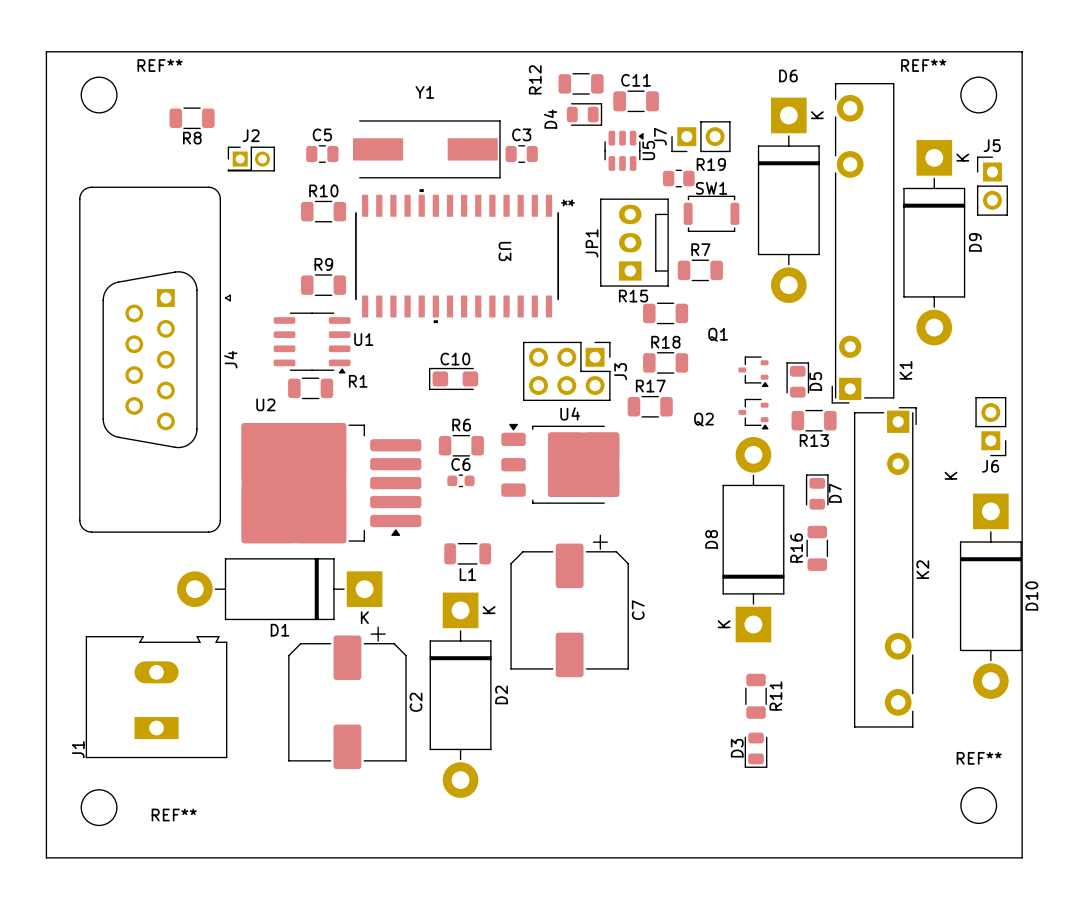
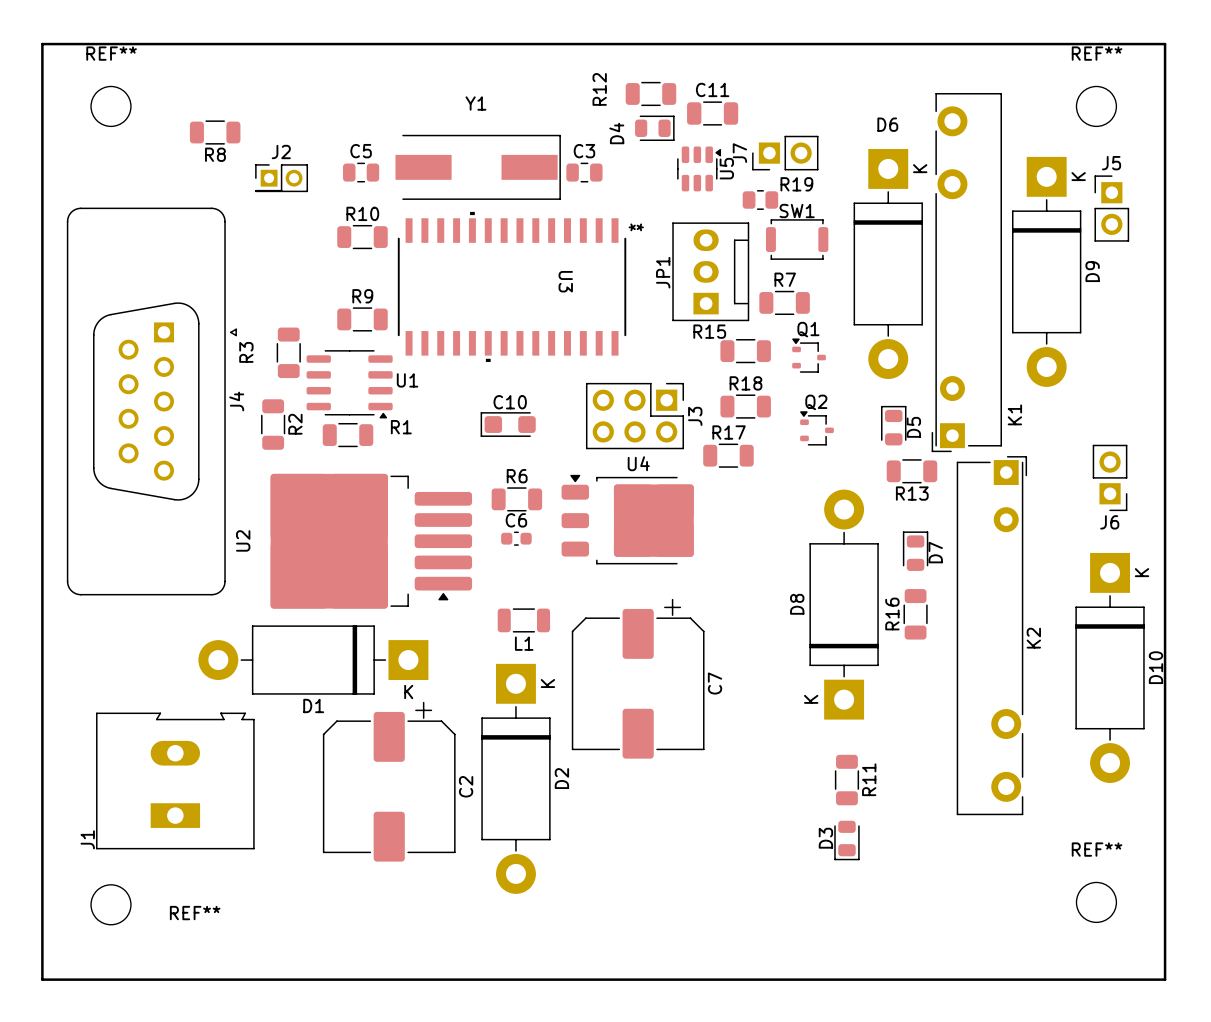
board edge: (46, 51) (1022, 51) (1022, 857) (46, 857) (46, 51) -> (42, 44) (42, 979) (1165, 979) (1165, 44) (42, 44)
REF** name position: REF** (160, 65) -> REF** (111, 53)
REF** name position: REF** (923, 65) -> REF** (1097, 53)
D6 position: (788, 200) -> (888, 263)
R3: none -> (288, 352)
Q1 name position: Q1 (718, 334) -> Q1 (808, 329)
J4 position: (155, 359) -> (151, 401)
Q1 rotation: 0° (753, 371) -> 180° (809, 355)
Q1 position: (753, 371) -> (809, 355)
R2: none -> (273, 424)
U2 name rotation: 0° (265, 404) -> 90° counterclockwise (243, 540)
U2 name position: U2 (265, 404) -> U2 (243, 540)
Q2 rotation: 0° (753, 414) -> 180° (816, 428)
Q2 position: (753, 414) -> (816, 428)
Q2 name position: Q2 (703, 419) -> Q2 (816, 402)
D10 text position: K (951, 475) -> K (1142, 572)

